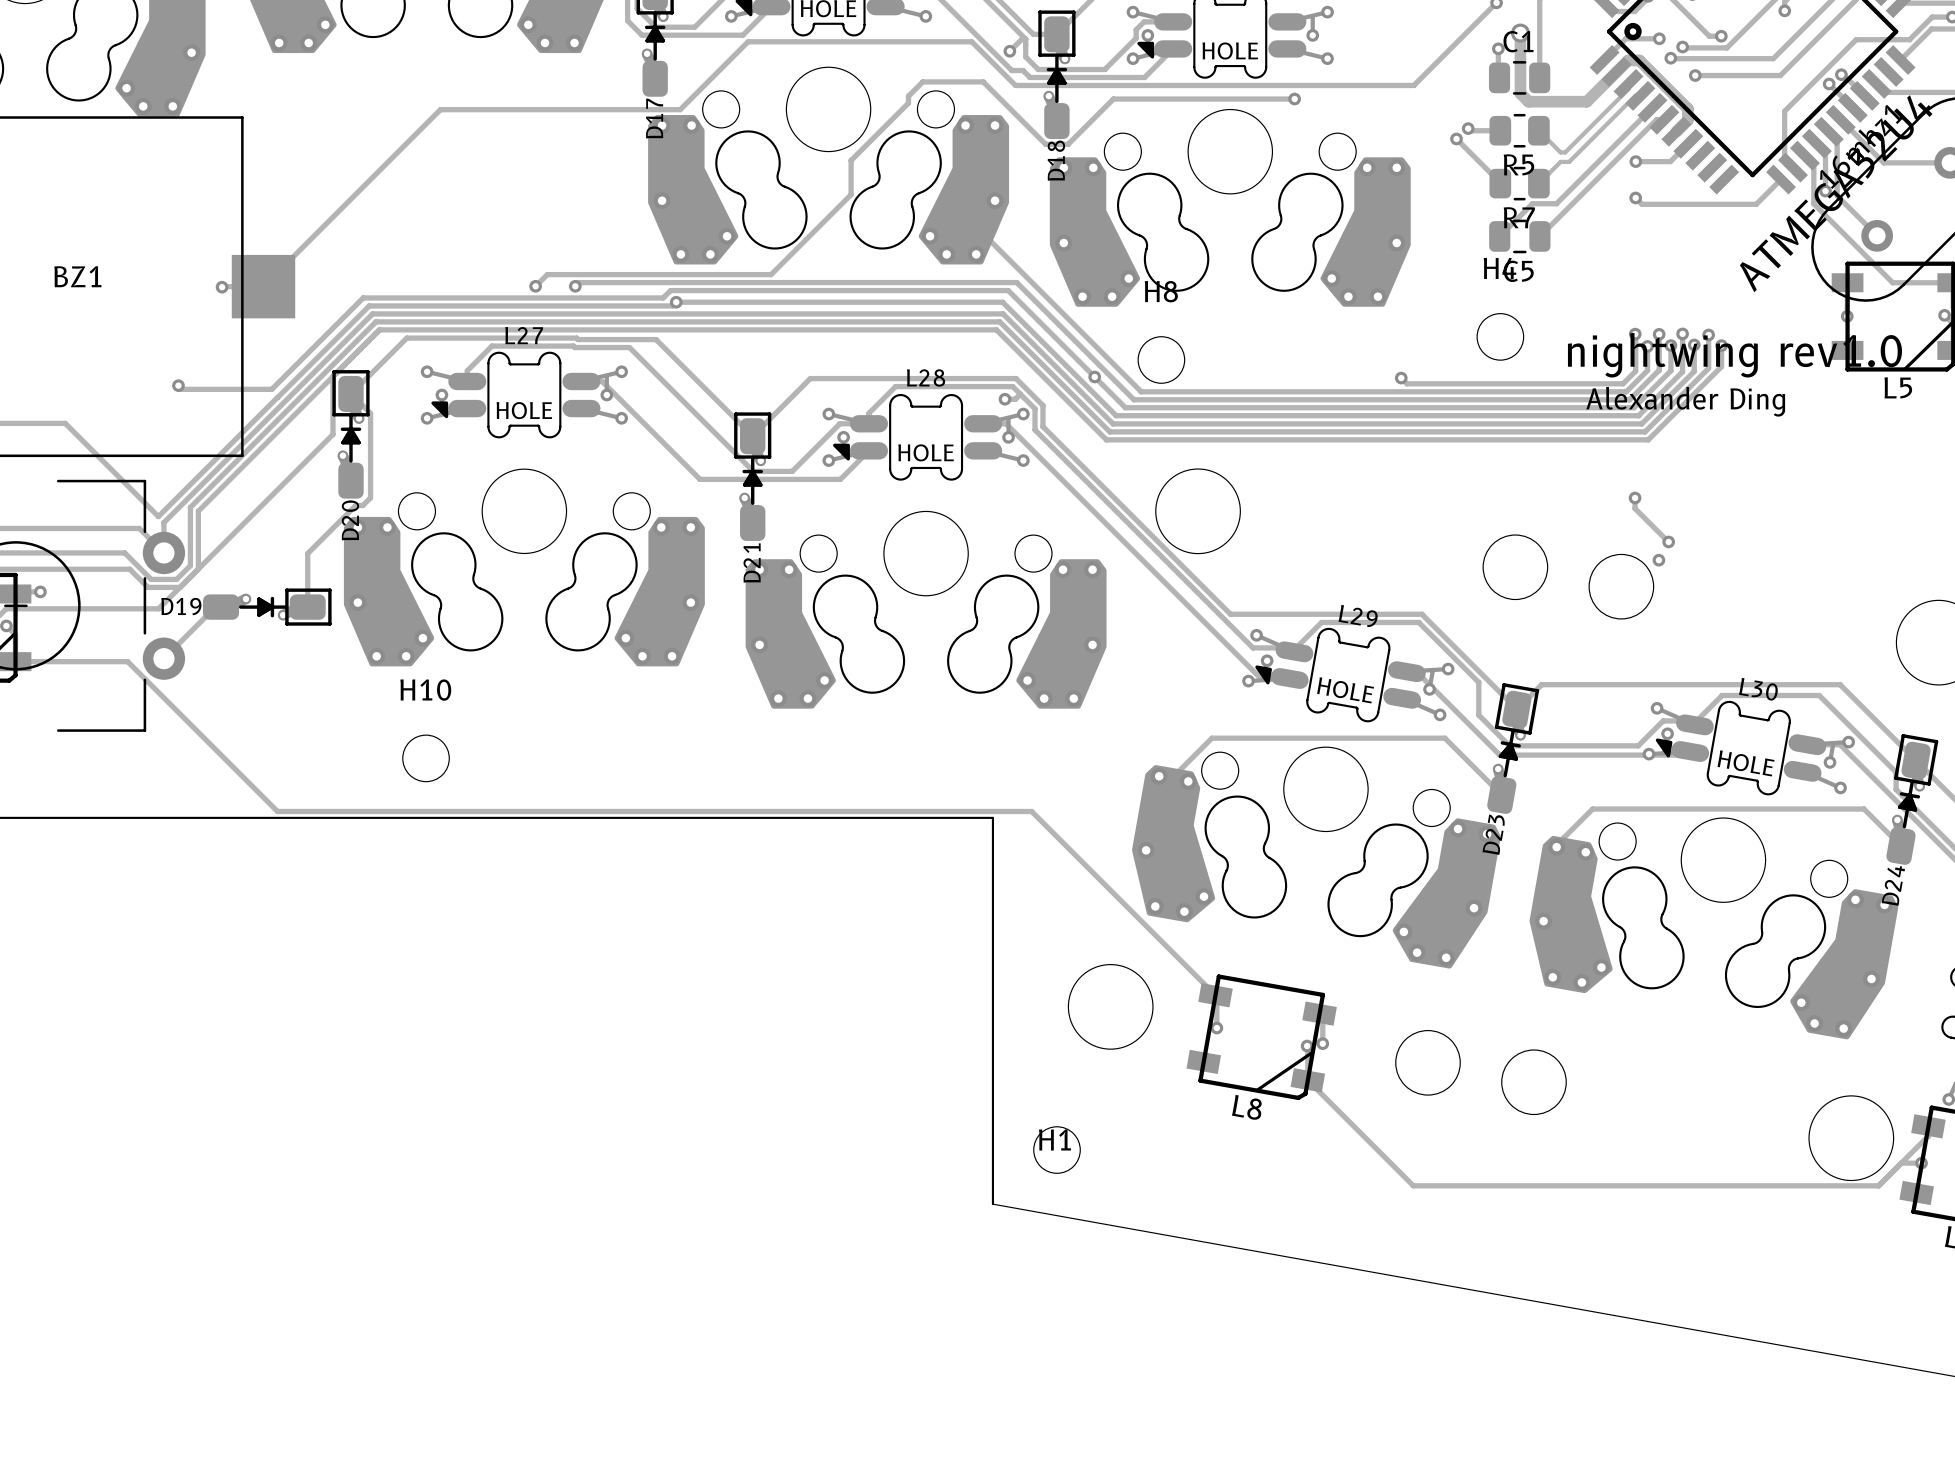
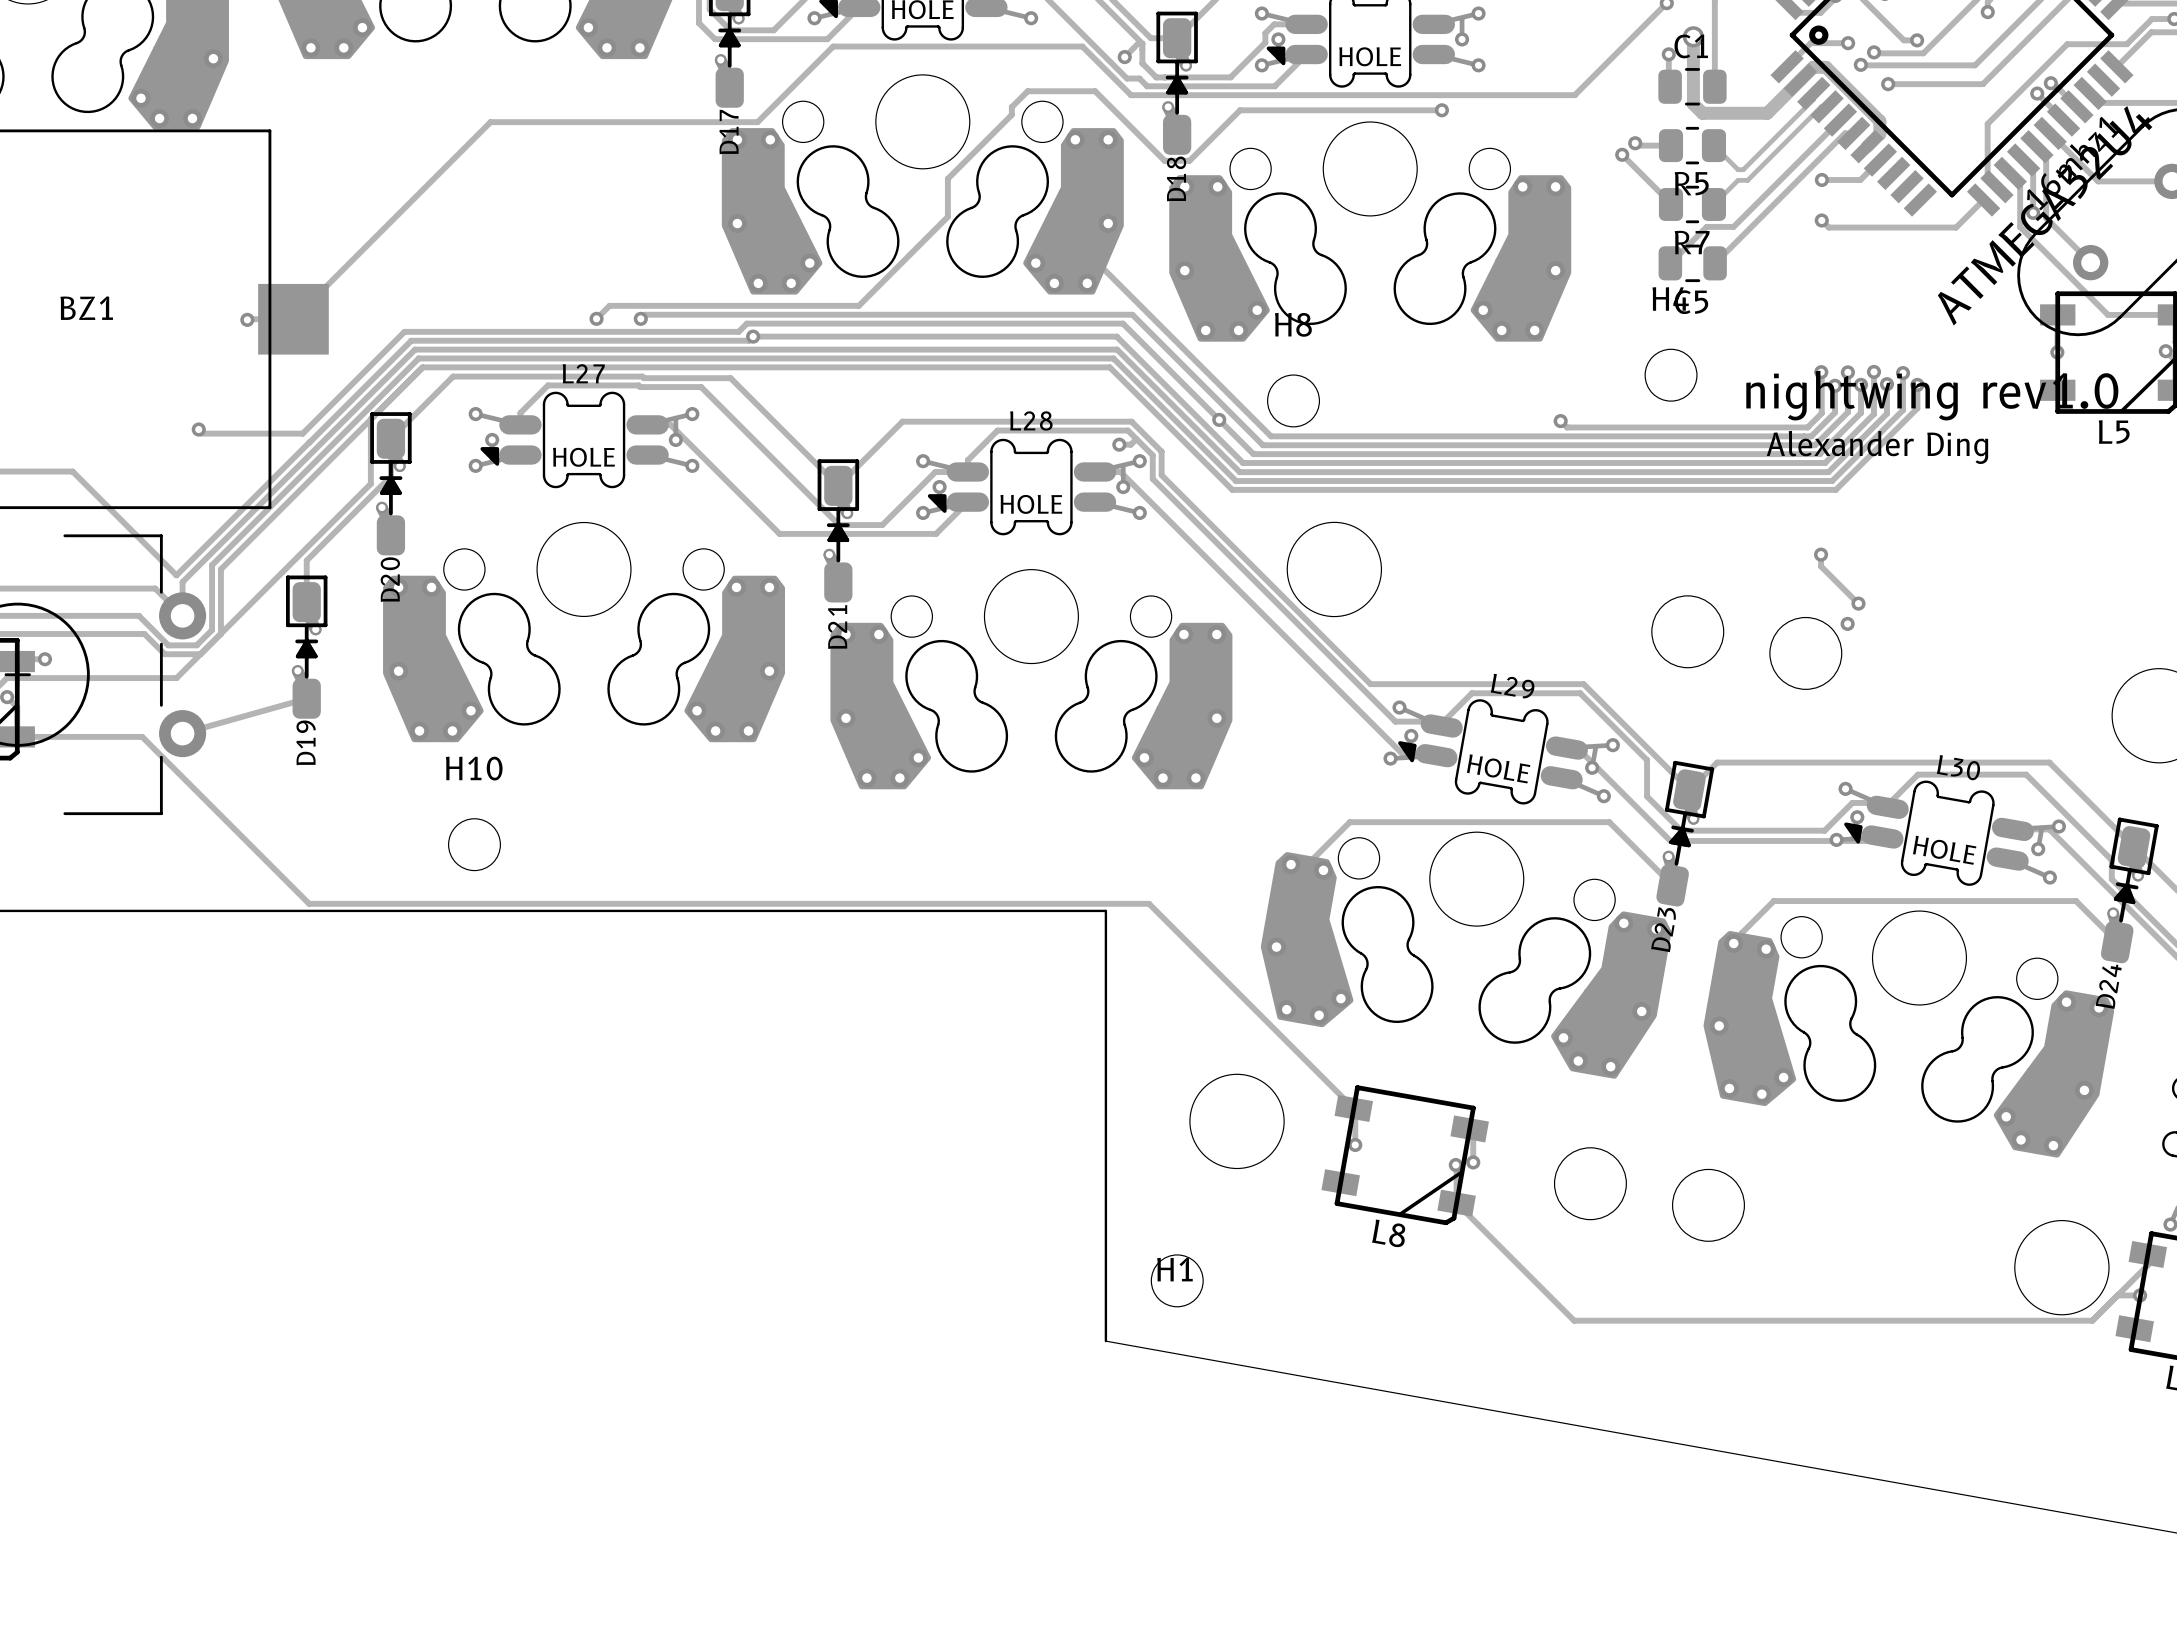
track: (351, 393) (370, 413) (370, 497) (362, 505) (355, 505) (307, 553) (307, 607) -> none
track: none -> (390, 448) (390, 476) (306, 560) (306, 602)
D19 footprint: [203, 588, 332, 626] -> [286, 575, 328, 719]
D19 name position: D19 (181, 606) -> D19 (306, 742)
track: (221, 607) (215, 607) (163, 658) -> (306, 698) (182, 733)

